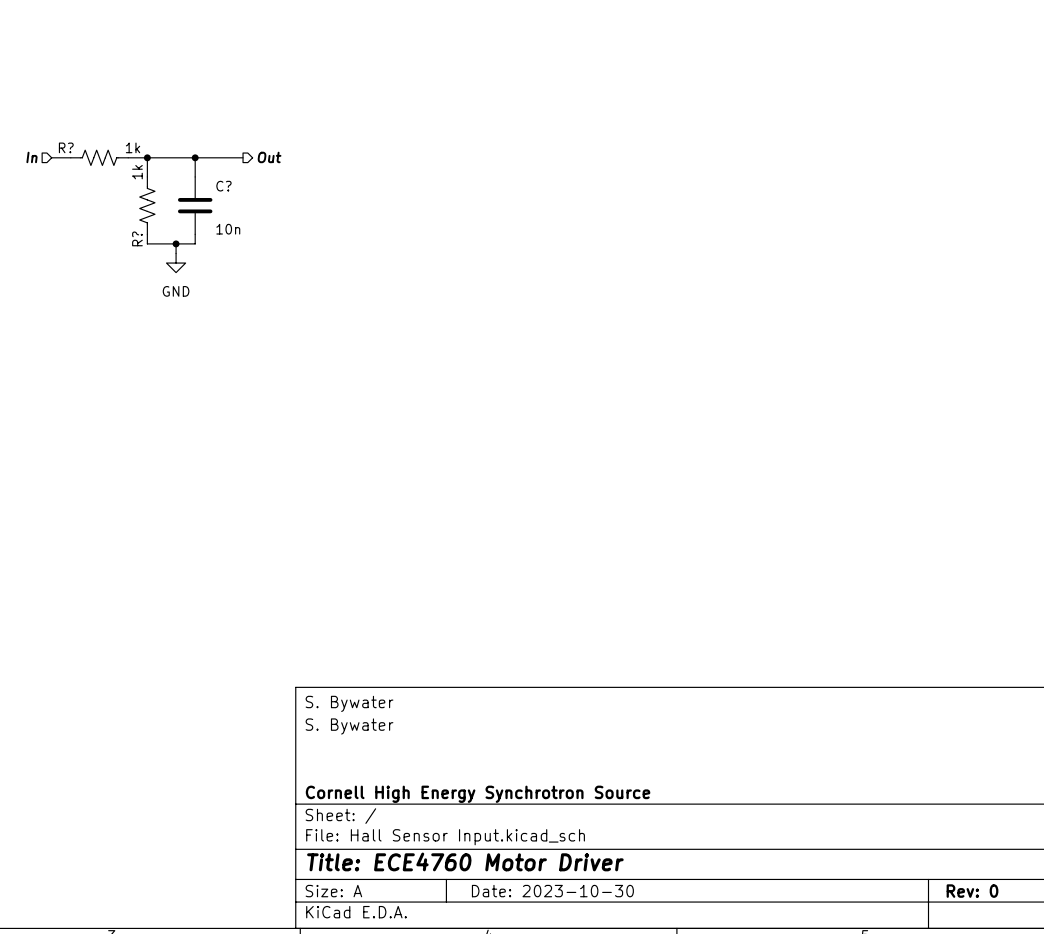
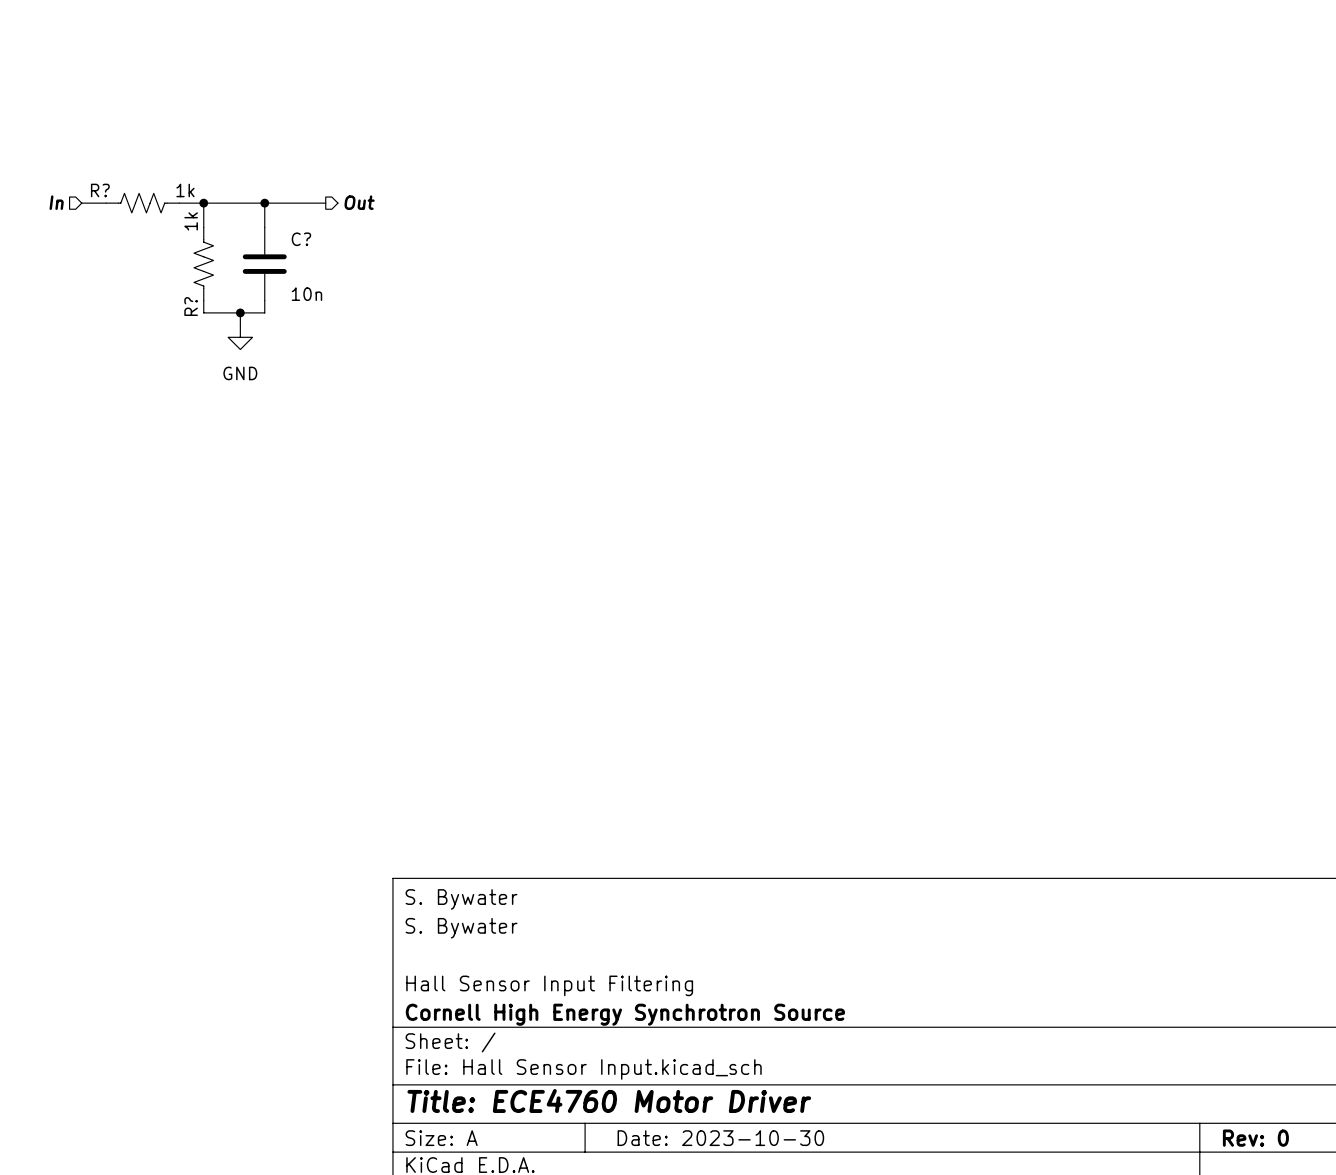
title block: none -> Hall Sensor Input Filtering (549, 985)

